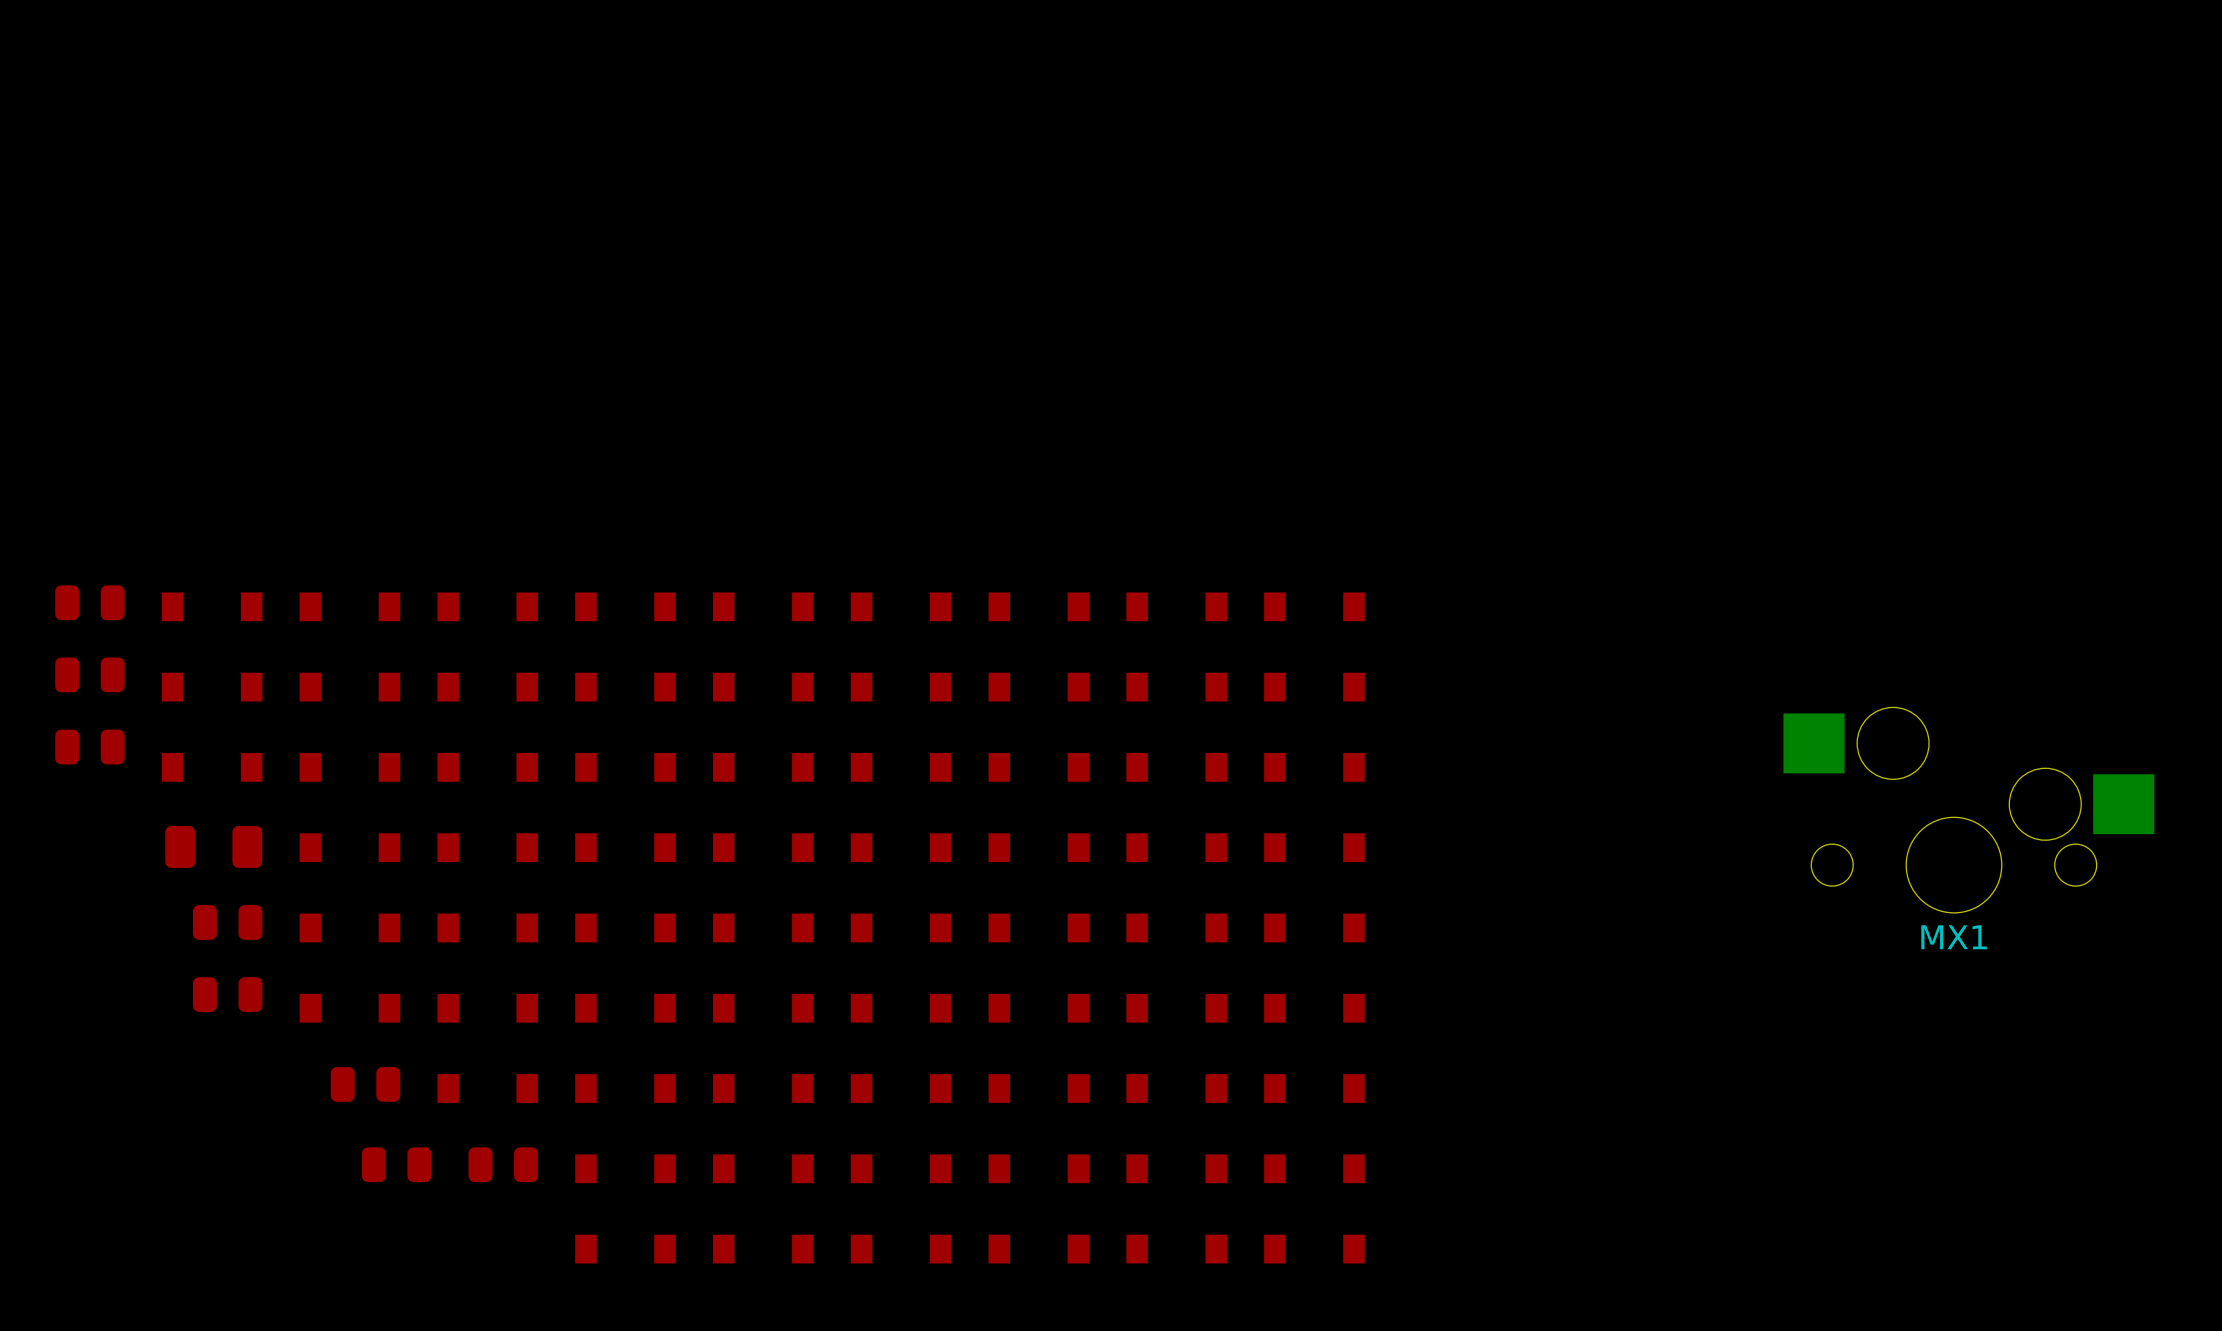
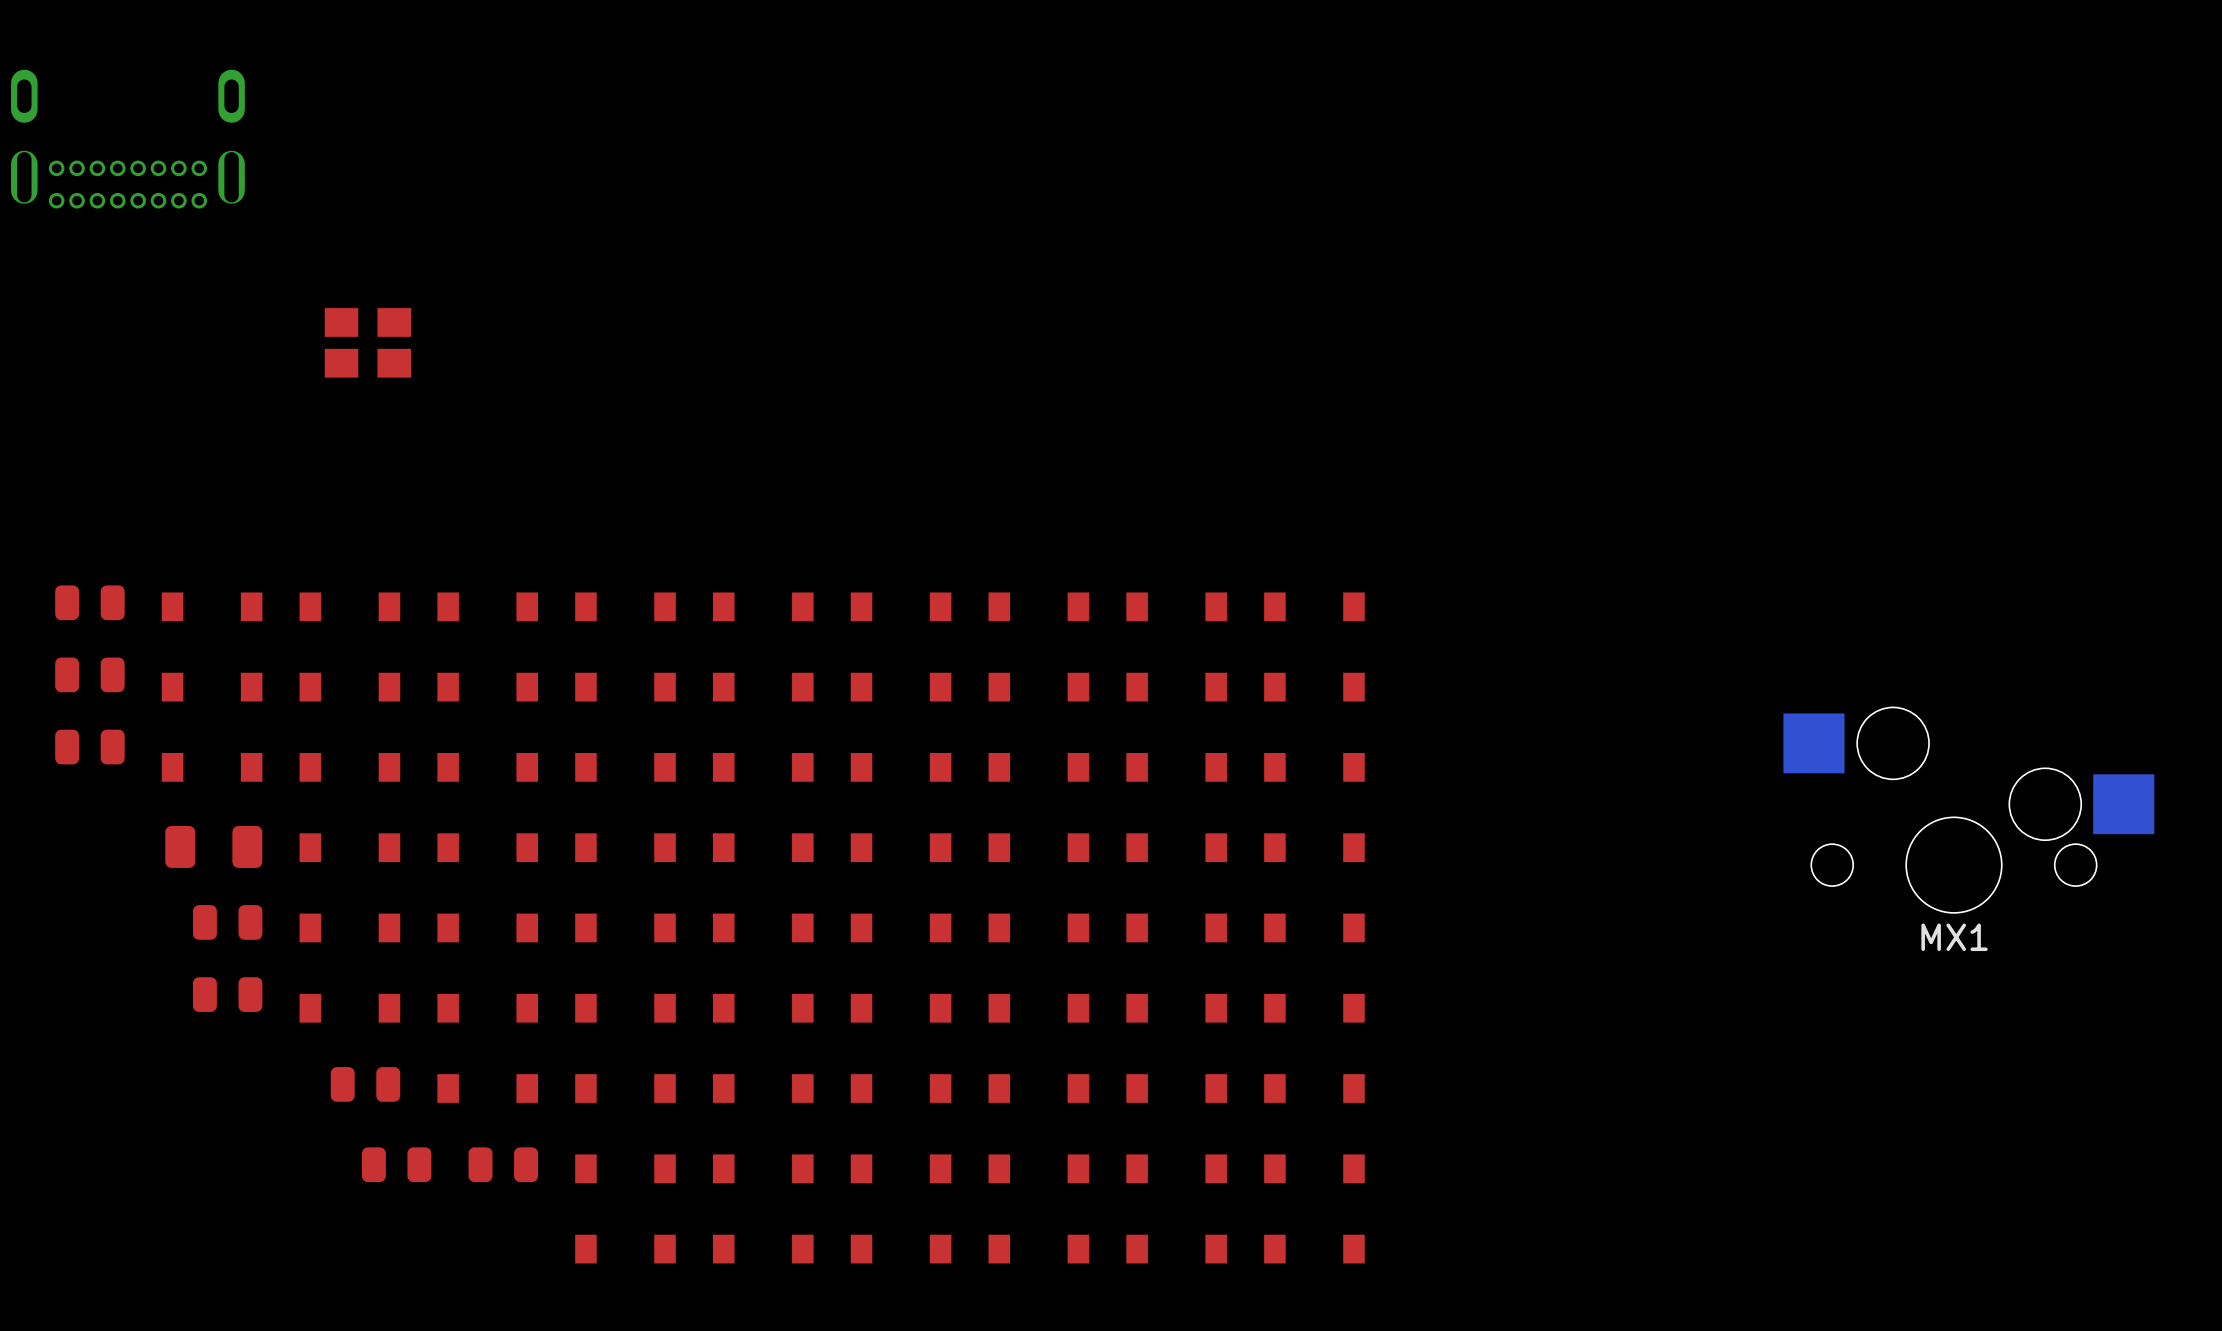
part: none -> (127, 139)
part: none -> (367, 342)

